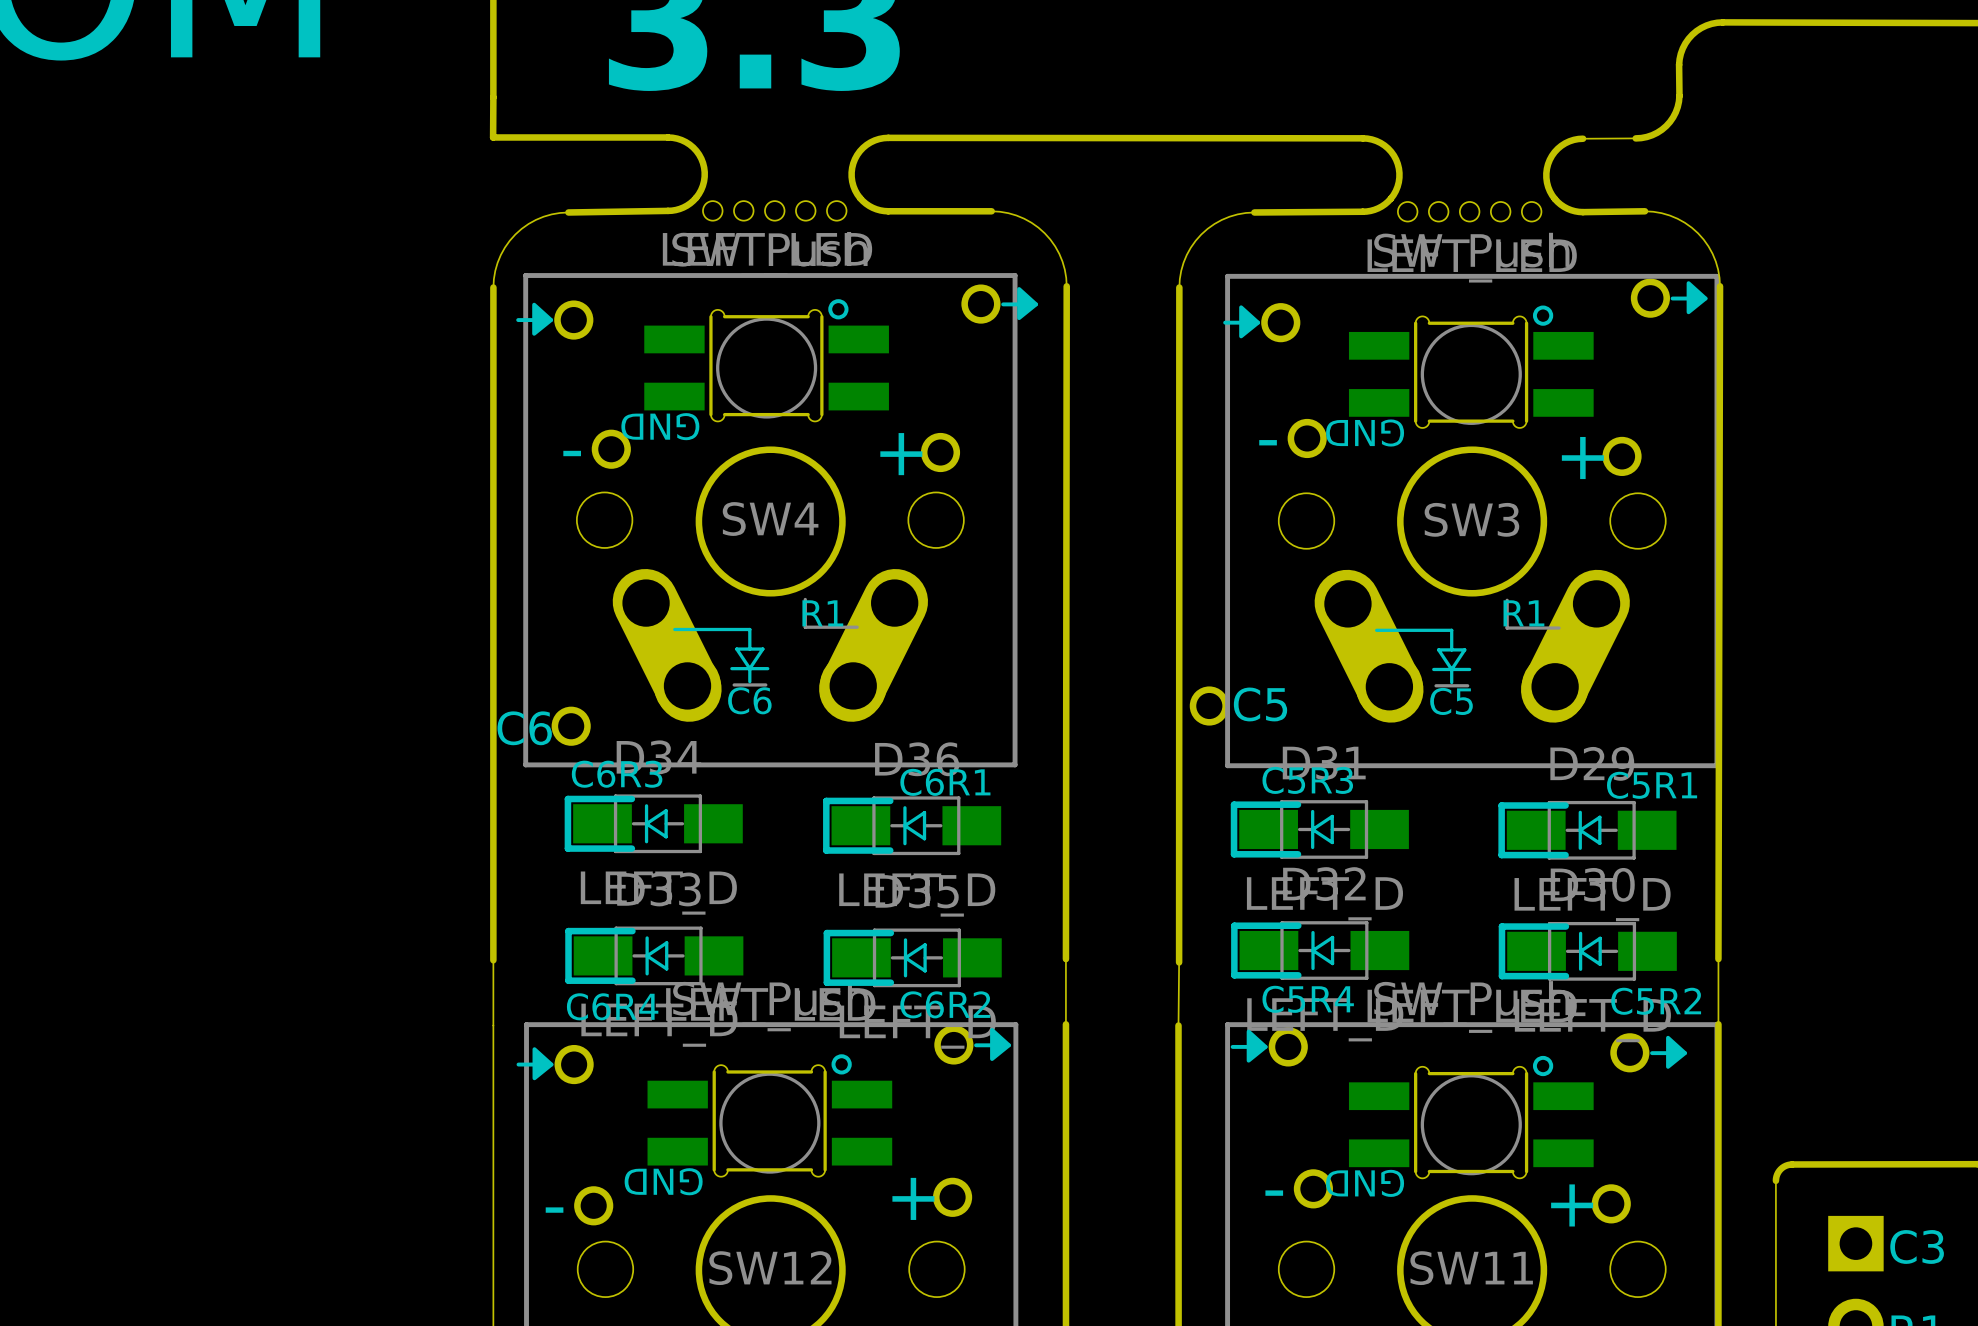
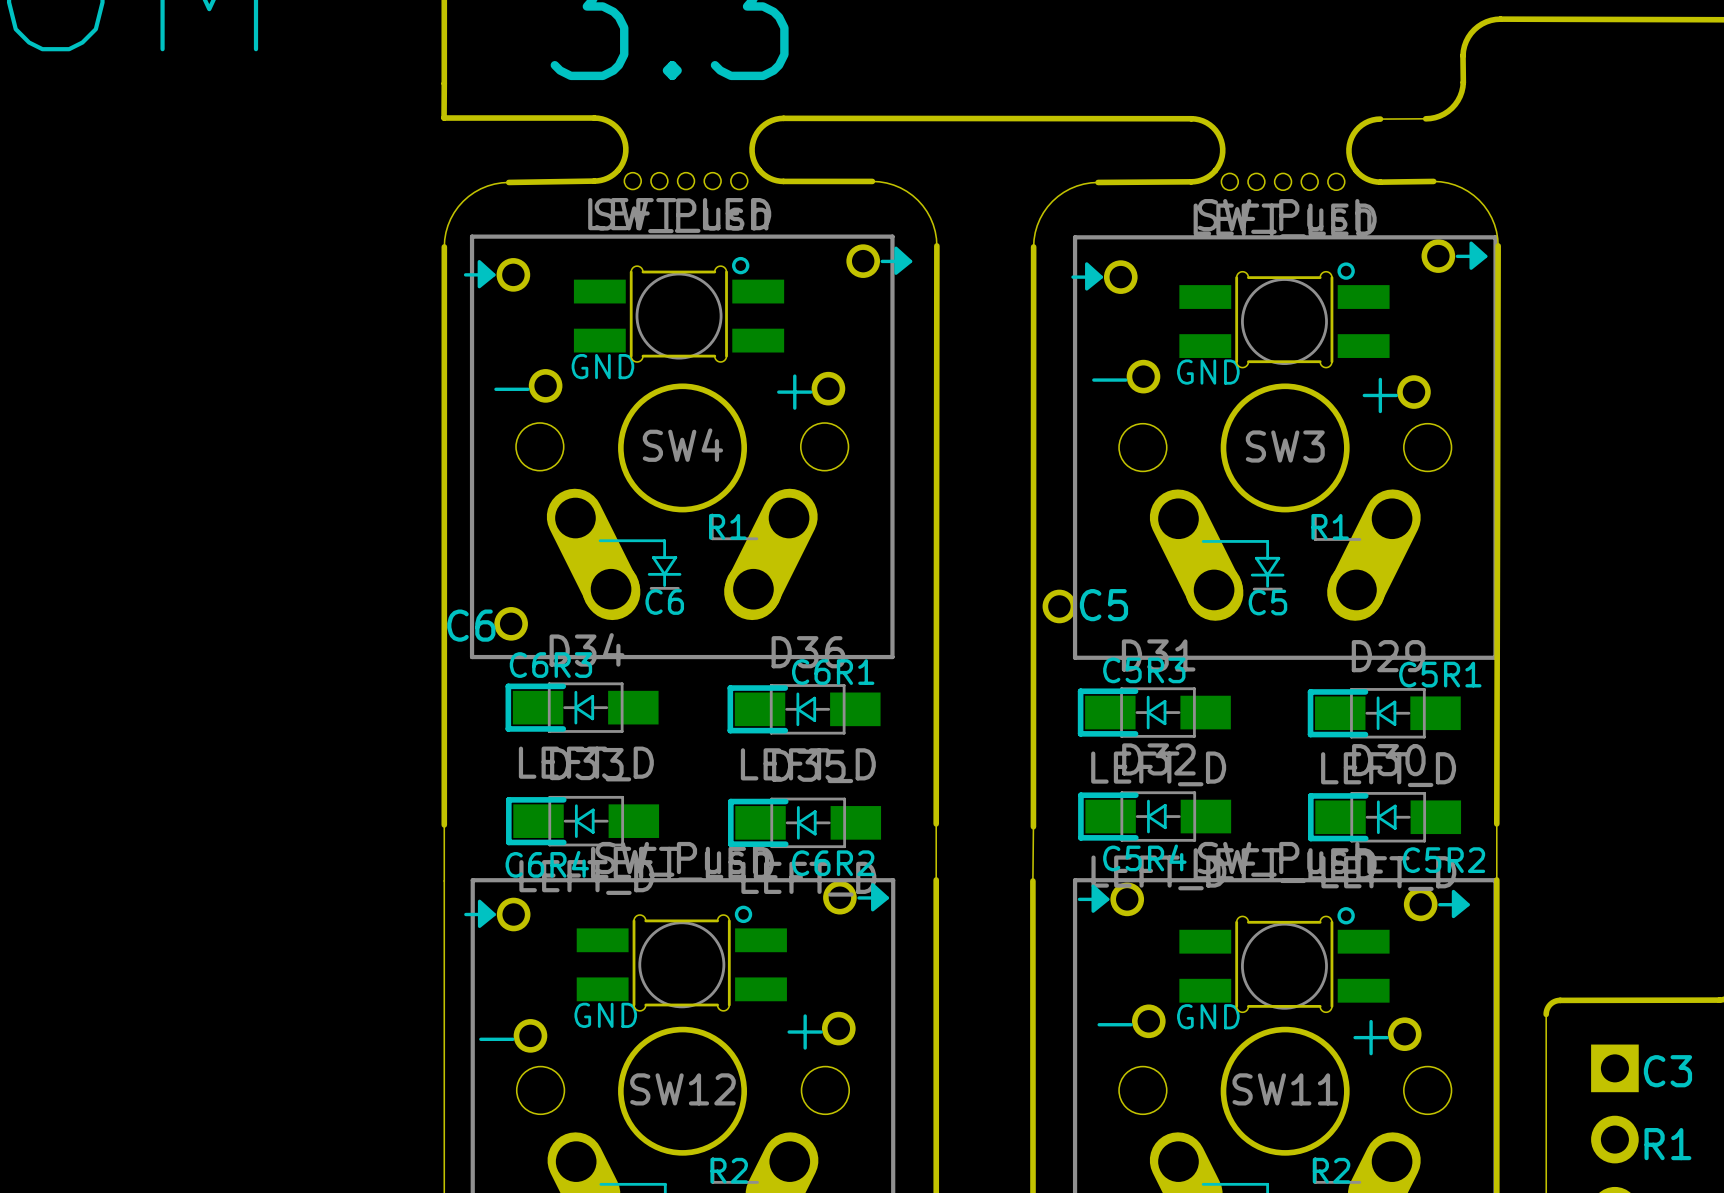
part text rotation: 0° (660, 426) -> 180° (602, 366)
part text rotation: 0° (1365, 433) -> 180° (1208, 372)
part text rotation: 0° (663, 1181) -> 180° (605, 1015)
part text rotation: 0° (1365, 1183) -> 180° (1208, 1016)

